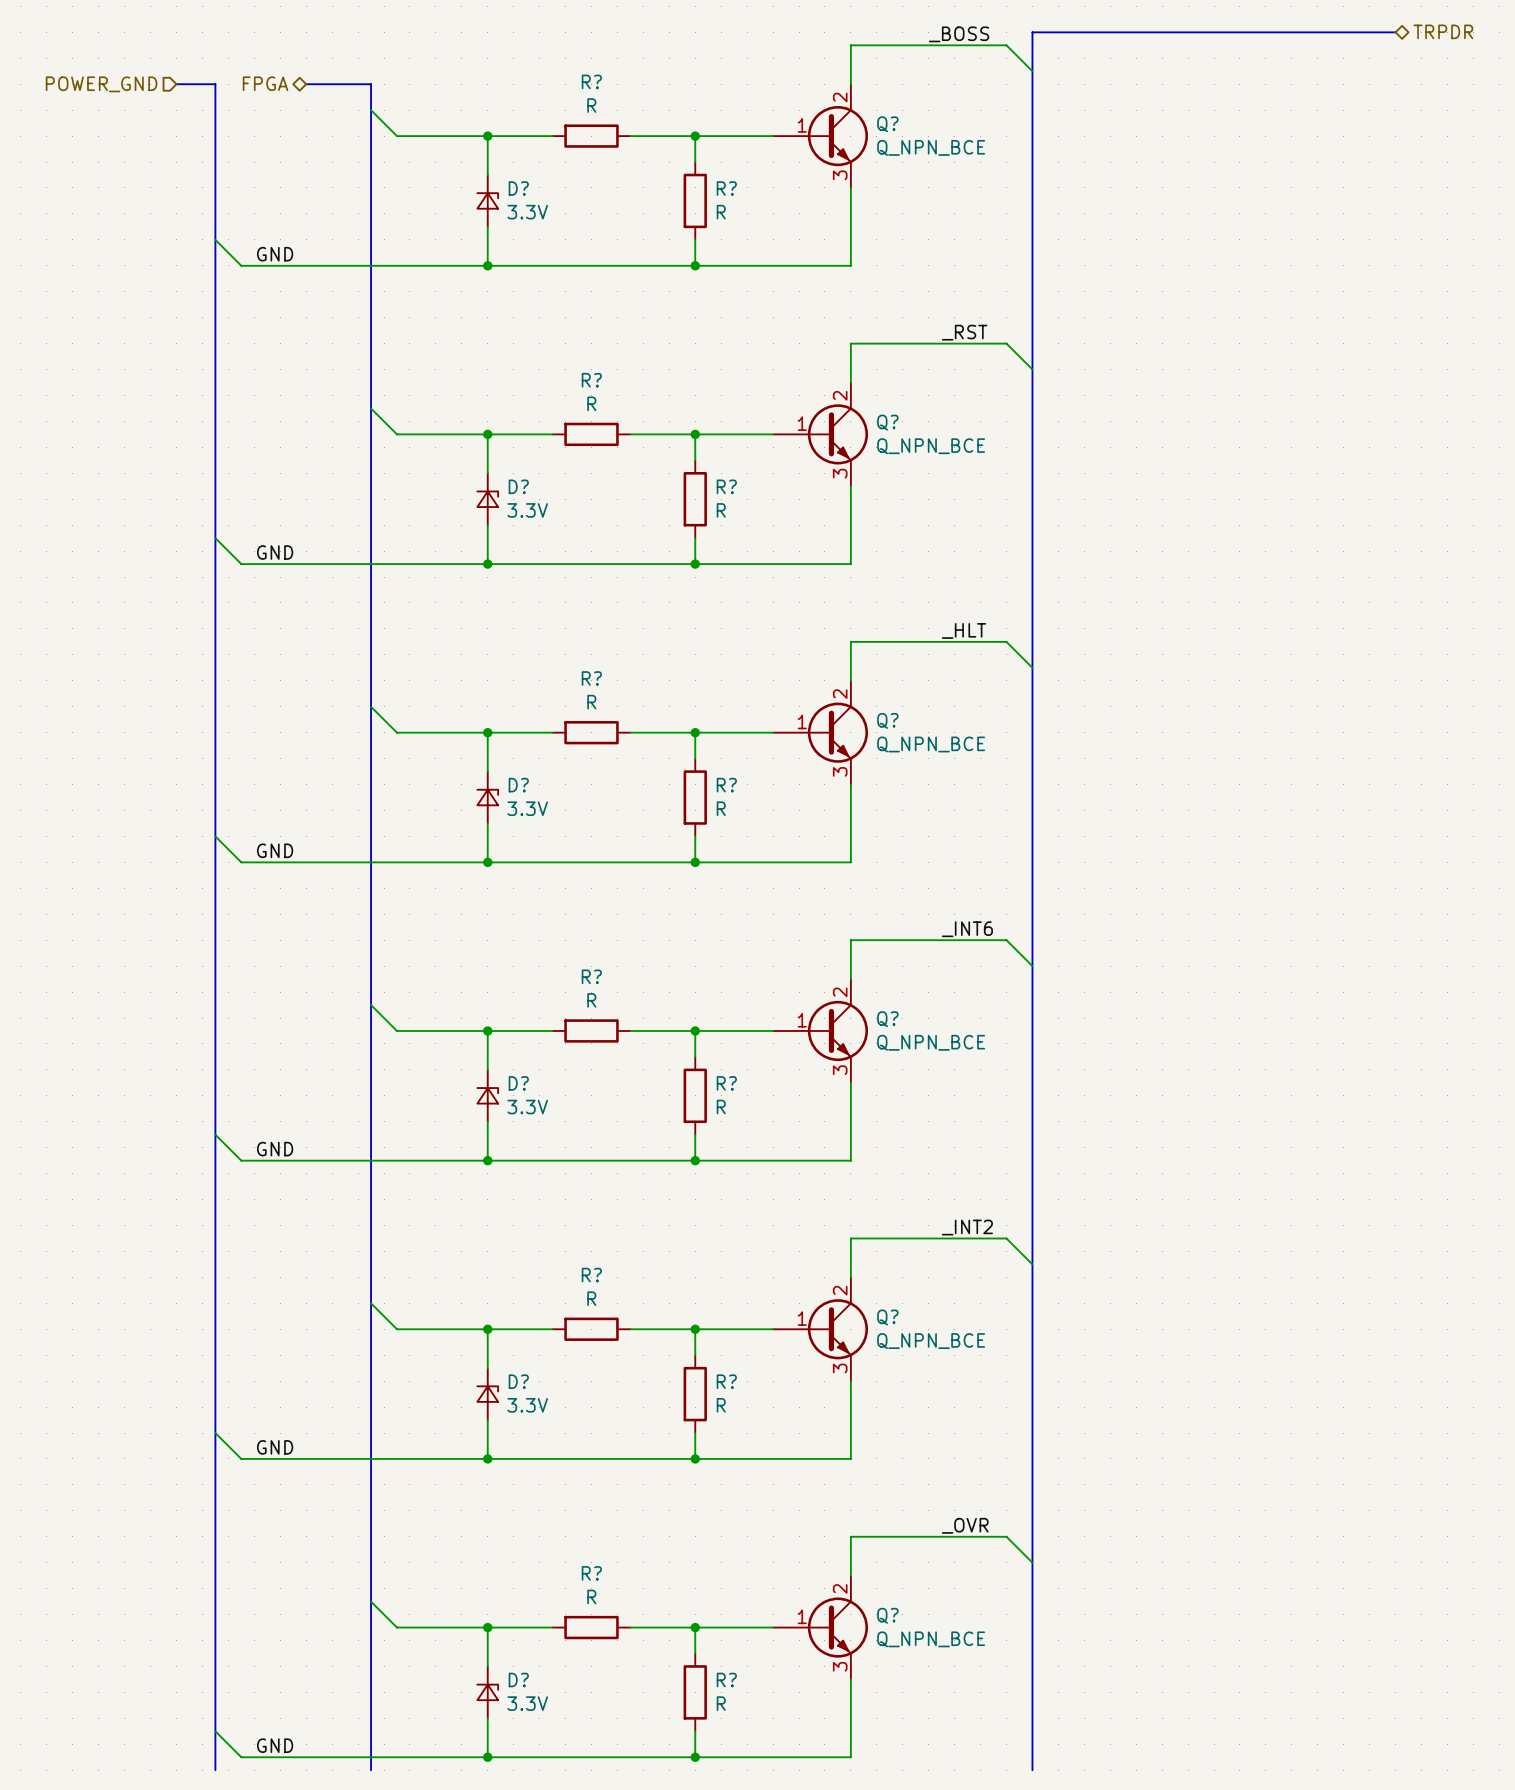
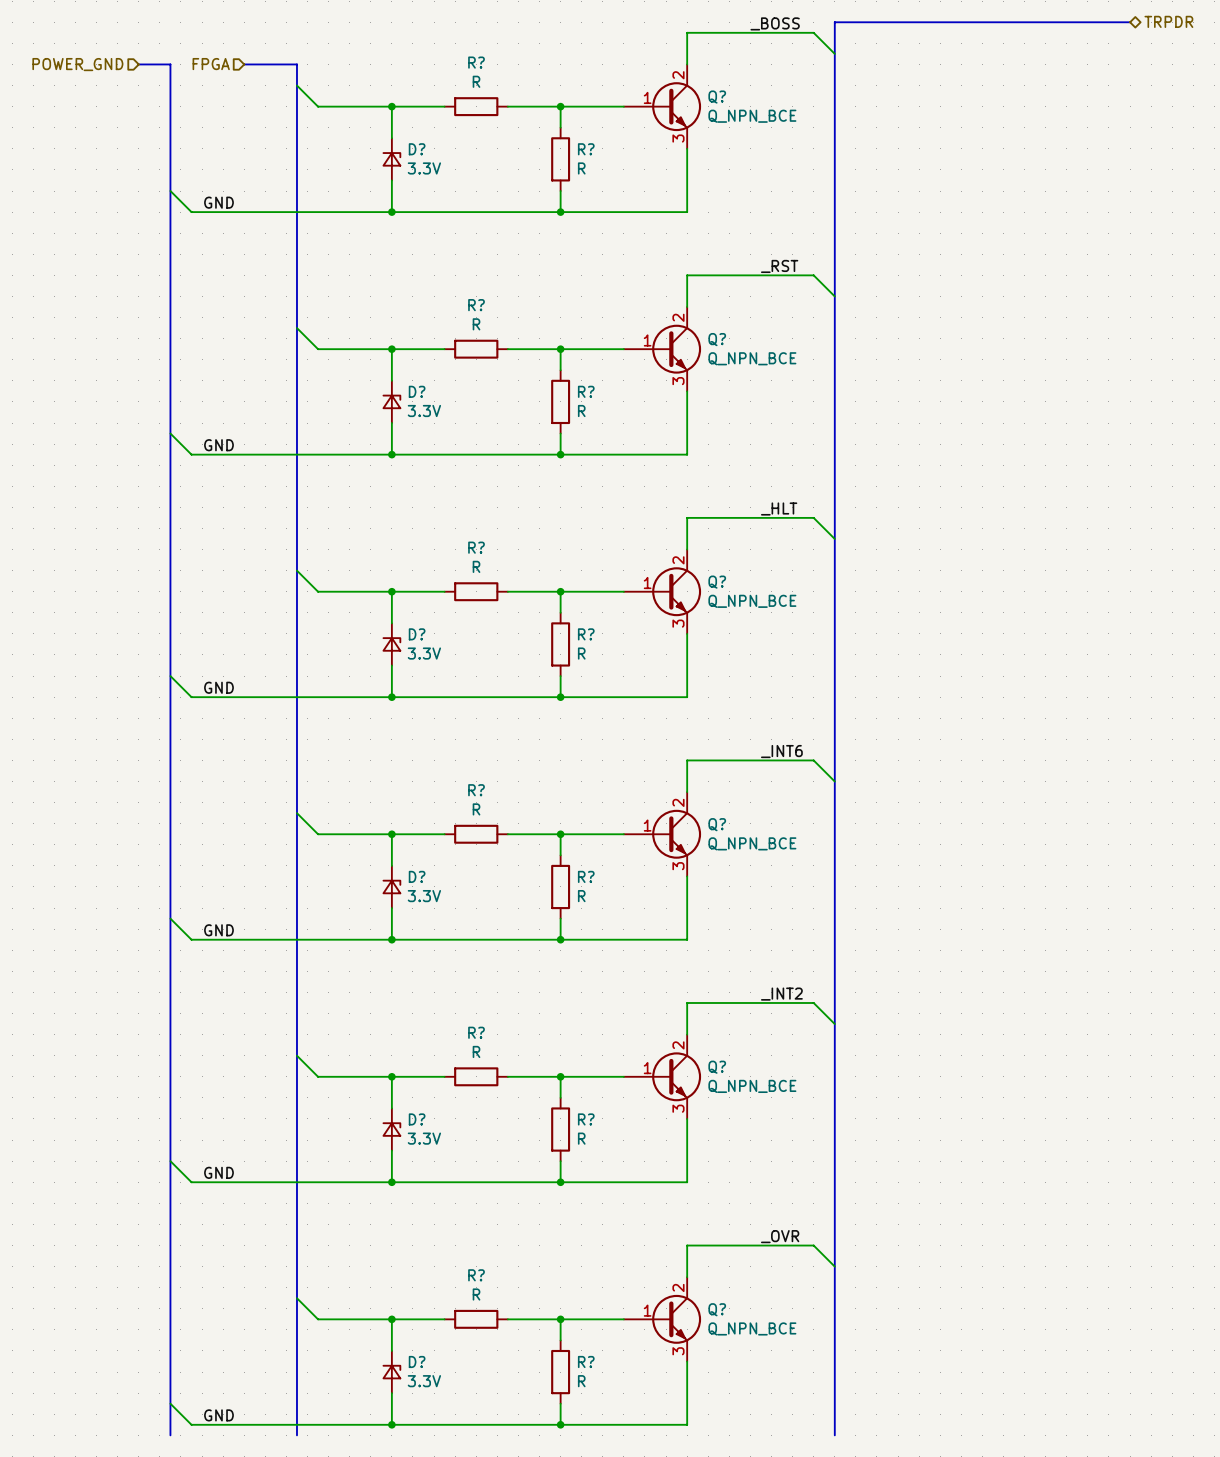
hierarchical label shape: bidirectional (265, 83) -> input (211, 64)

